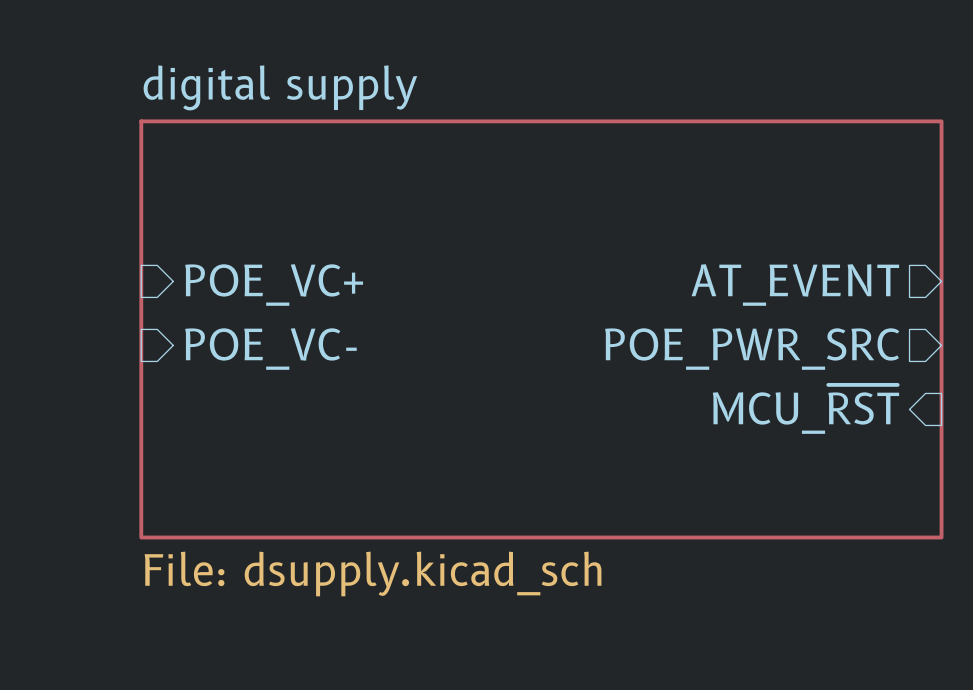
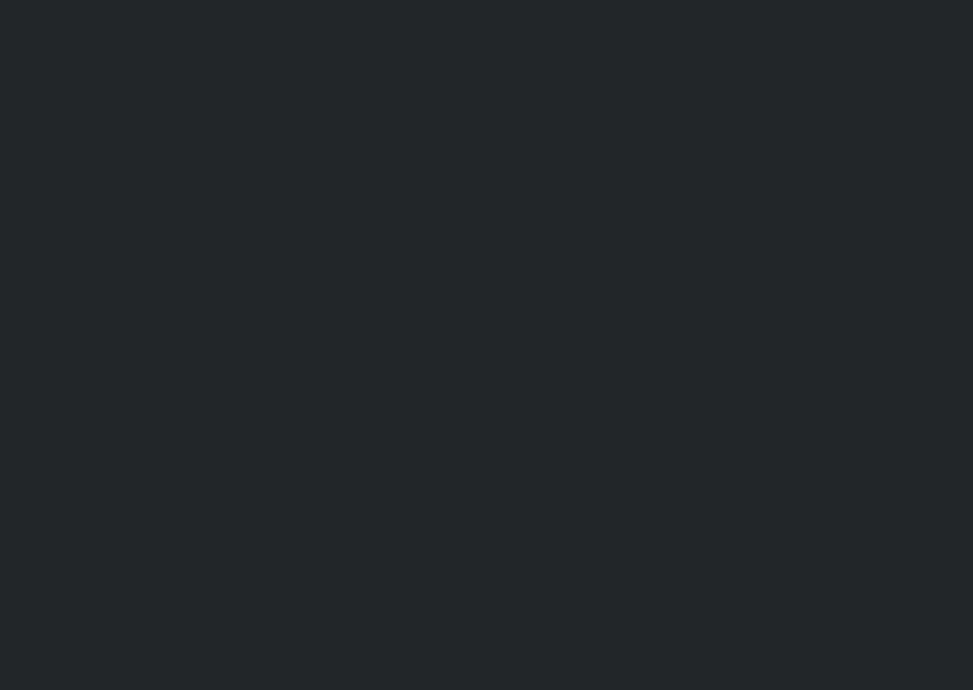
sheet pin: POE_VC+ (274, 285) -> none
sheet pin: AT_EVENT (795, 285) -> none
sheet digital supply: File: dsupply.kicad_sch (541, 329) -> none
sheet pin: POE_VC- (270, 349) -> none
sheet pin: POE_PWR_SRC (752, 349) -> none
sheet pin: MCU_~{RST} (805, 409) -> none

